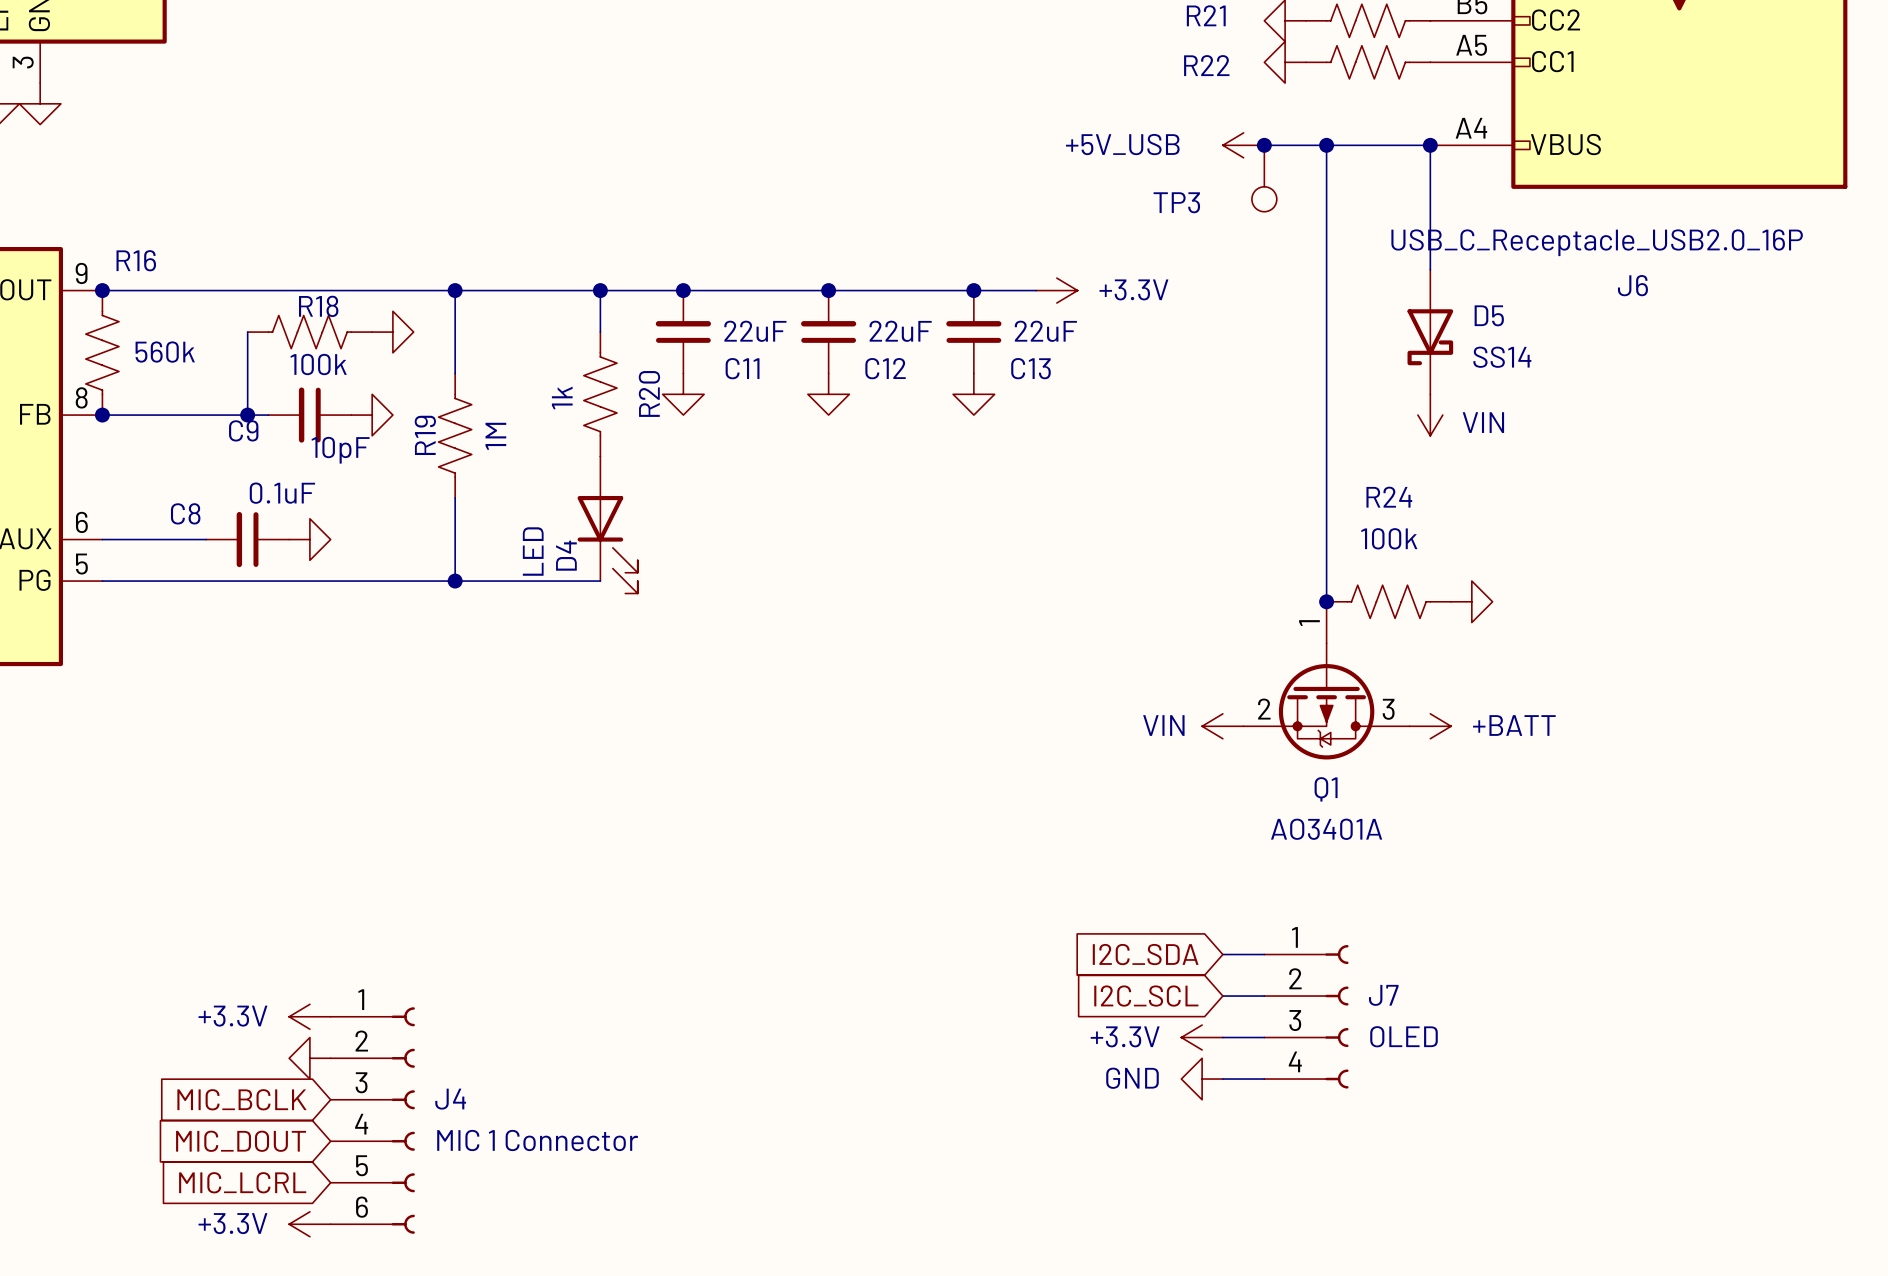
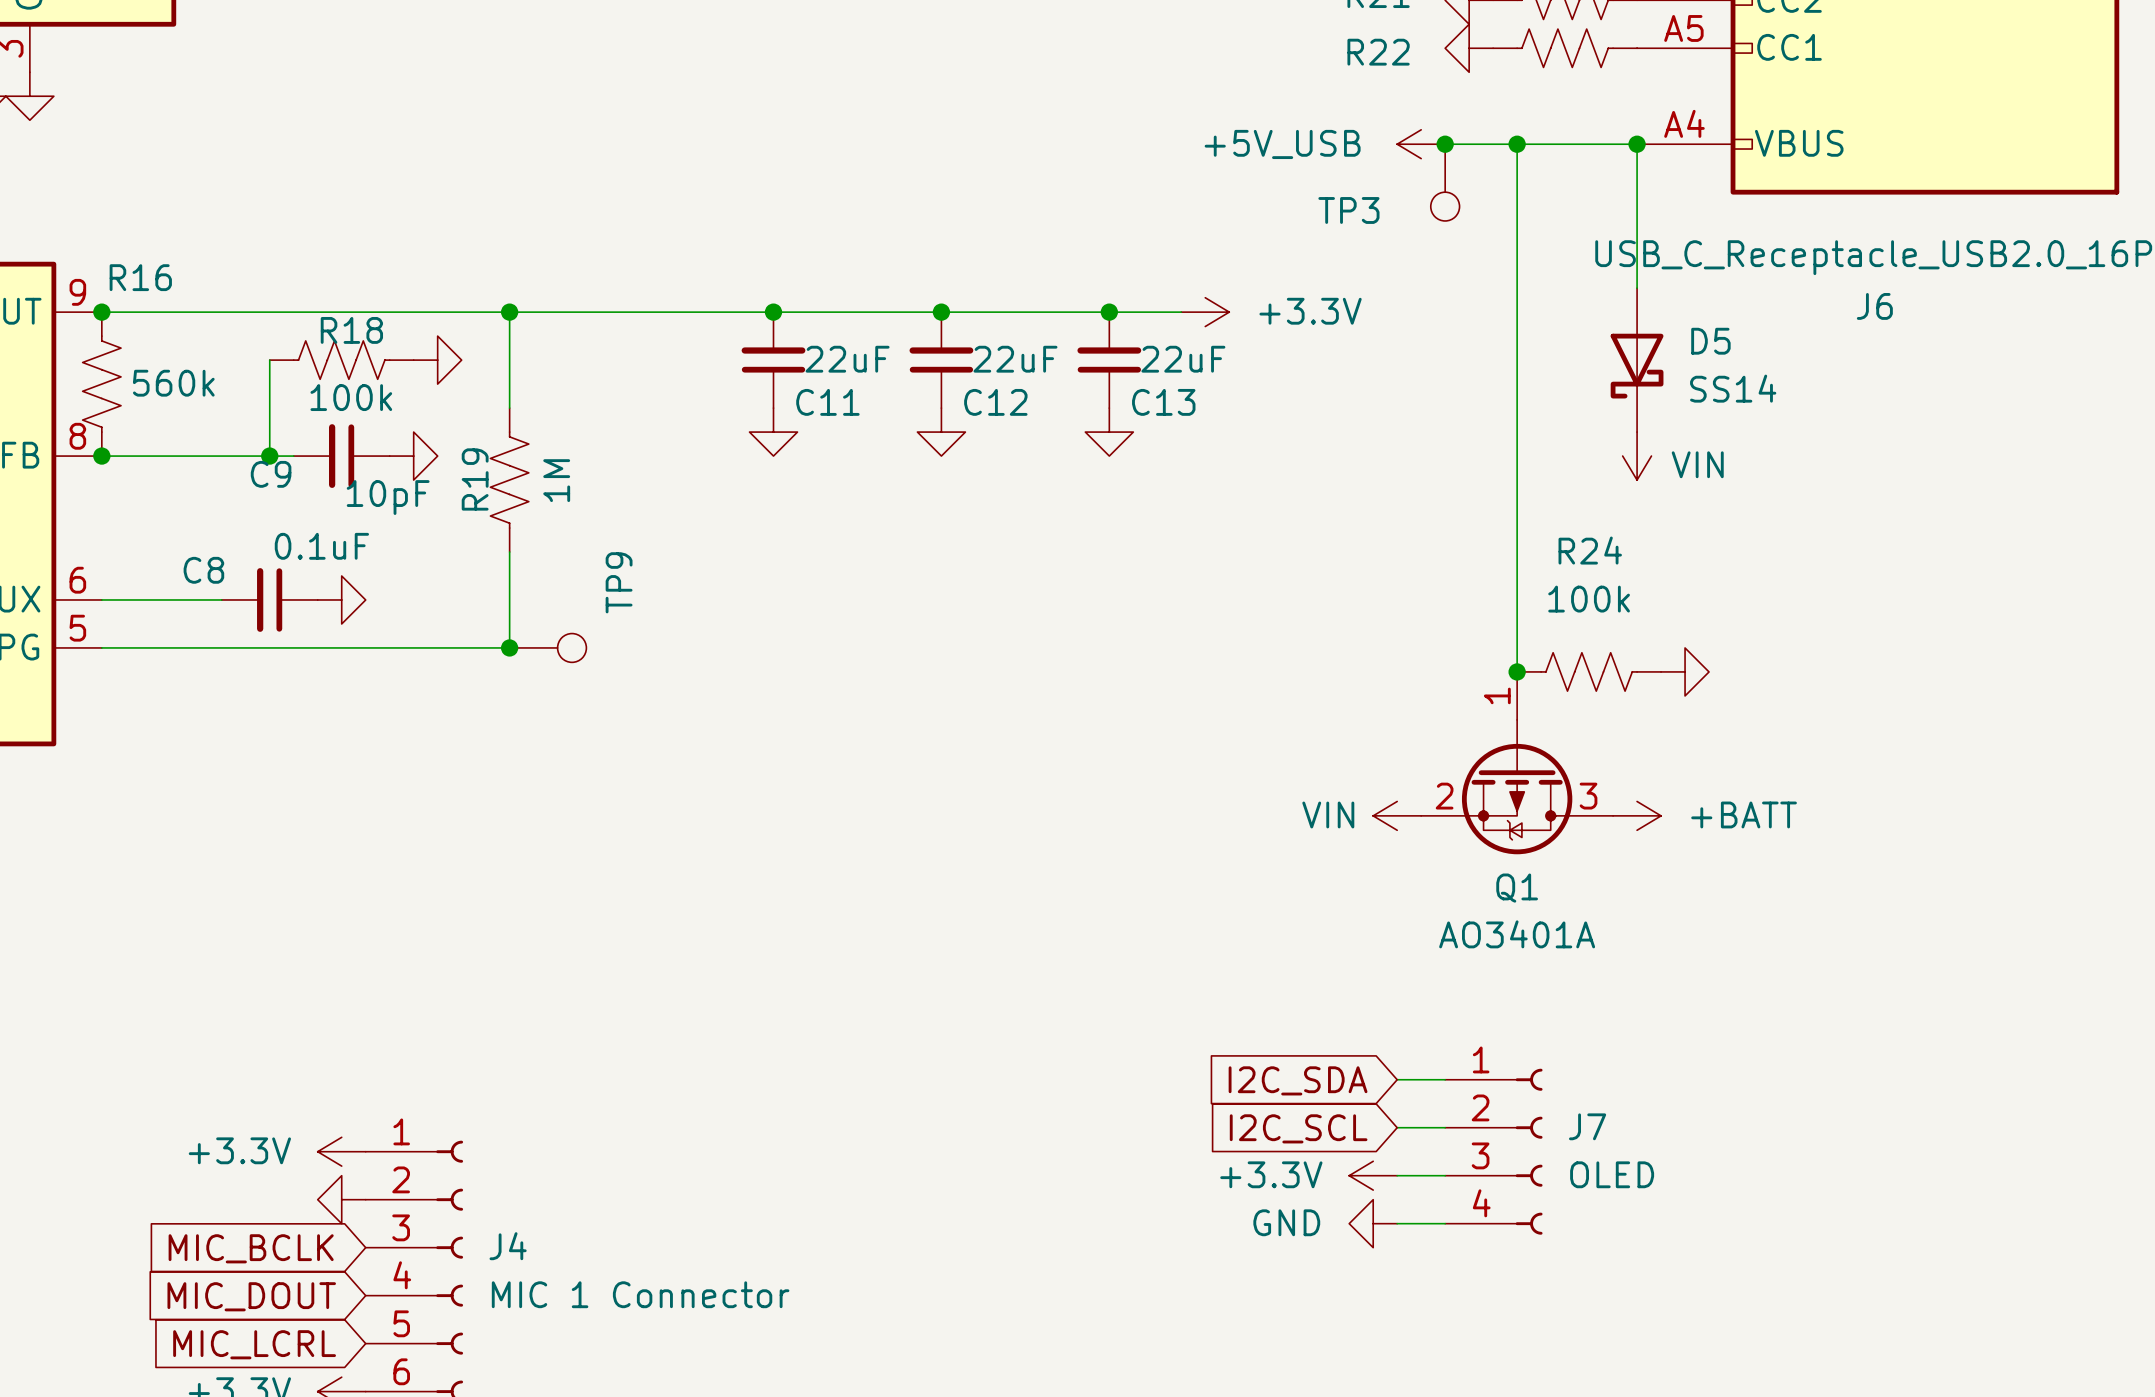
wire: (600, 290) (600, 332) -> none
junction: (600, 290) -> none
R20: 1k (600, 394) -> none
D4: LED (607, 525) -> none
wire: (455, 581) (600, 581) -> none
TP9: none -> (548, 647)

